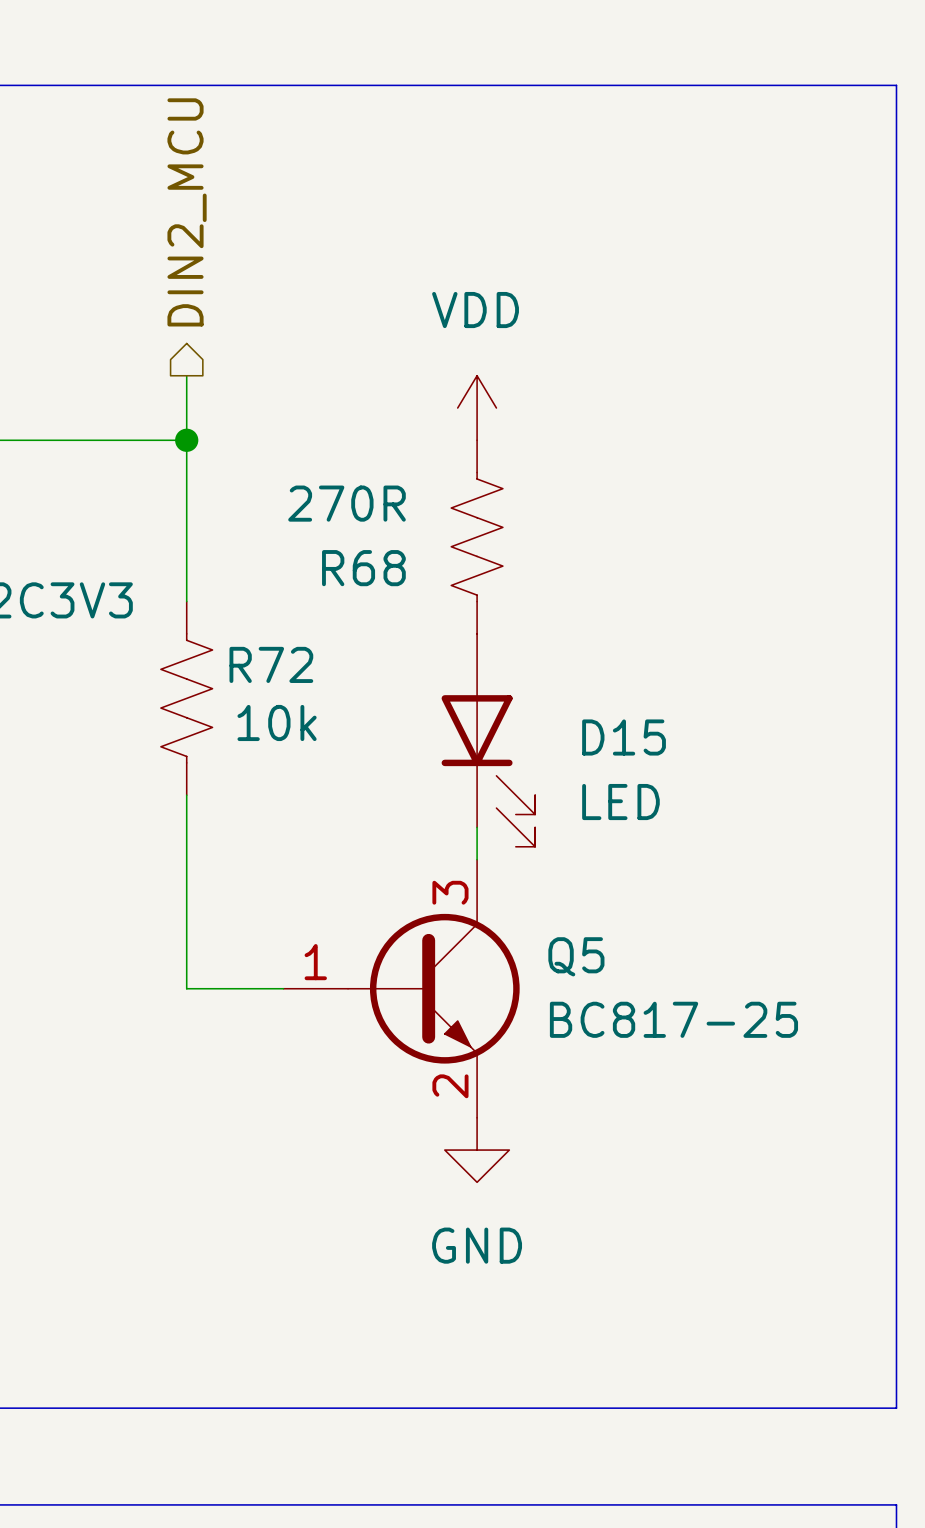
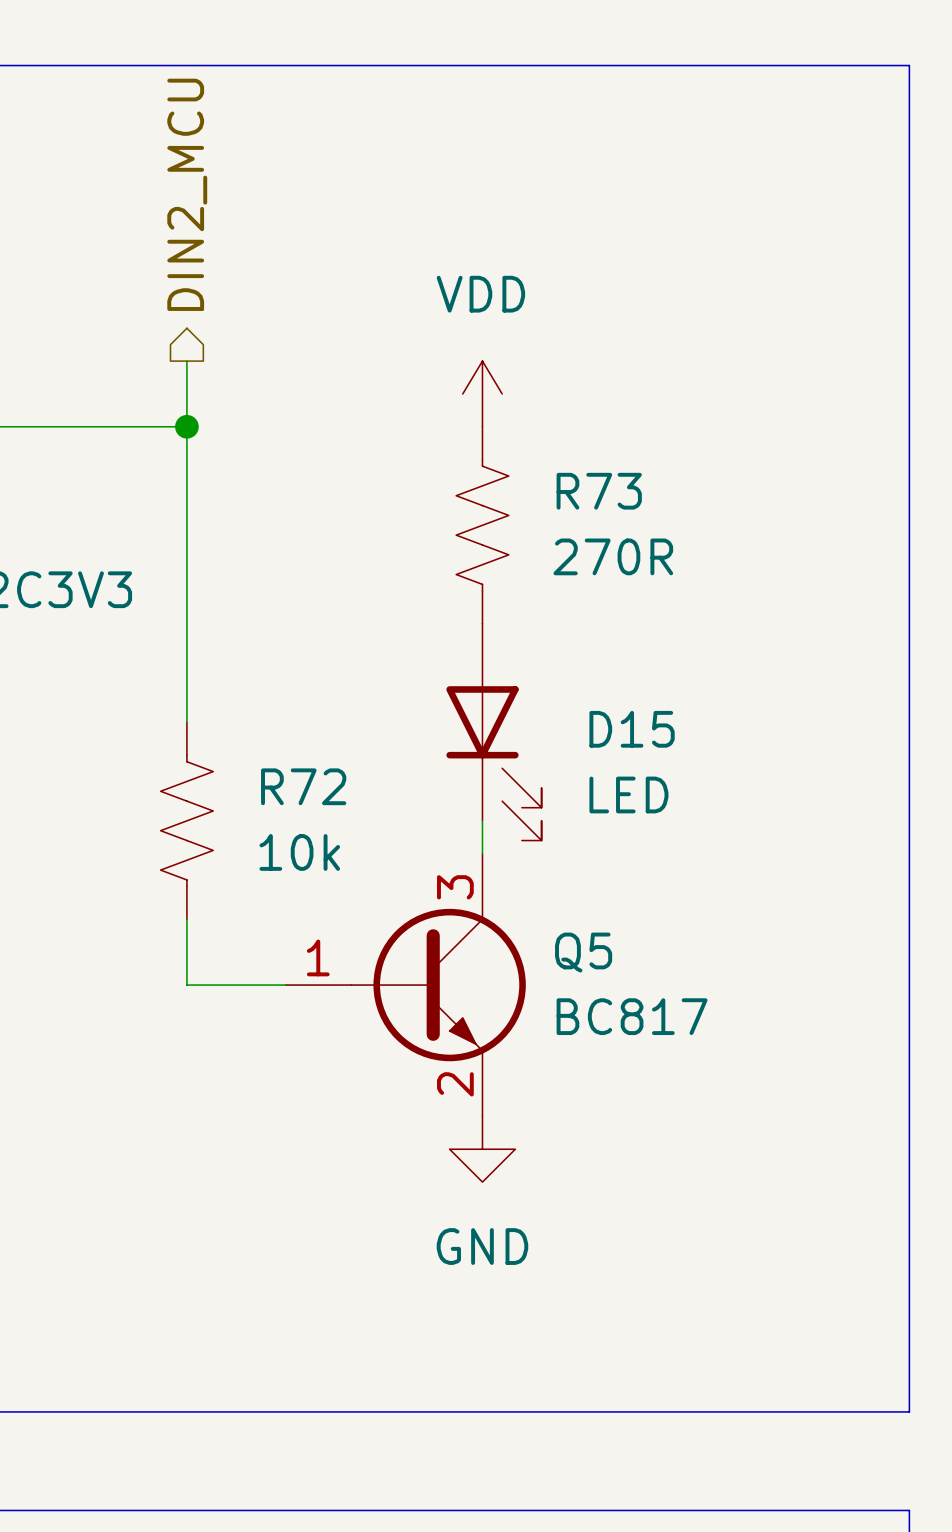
R68 value position: 270R (347, 503) -> 270R (613, 556)
R68 name: R68 (363, 568) -> R73 (599, 491)
R72 name position: R72 (271, 664) -> R72 (303, 786)
R72 position: (186, 698) -> (186, 820)
R72 value position: 10k (277, 722) -> 10k (299, 852)
wire: (186, 795) (186, 924) -> (186, 590) (186, 722)
Q5 value: BC817-25 (673, 1019) -> BC817 (632, 1016)

